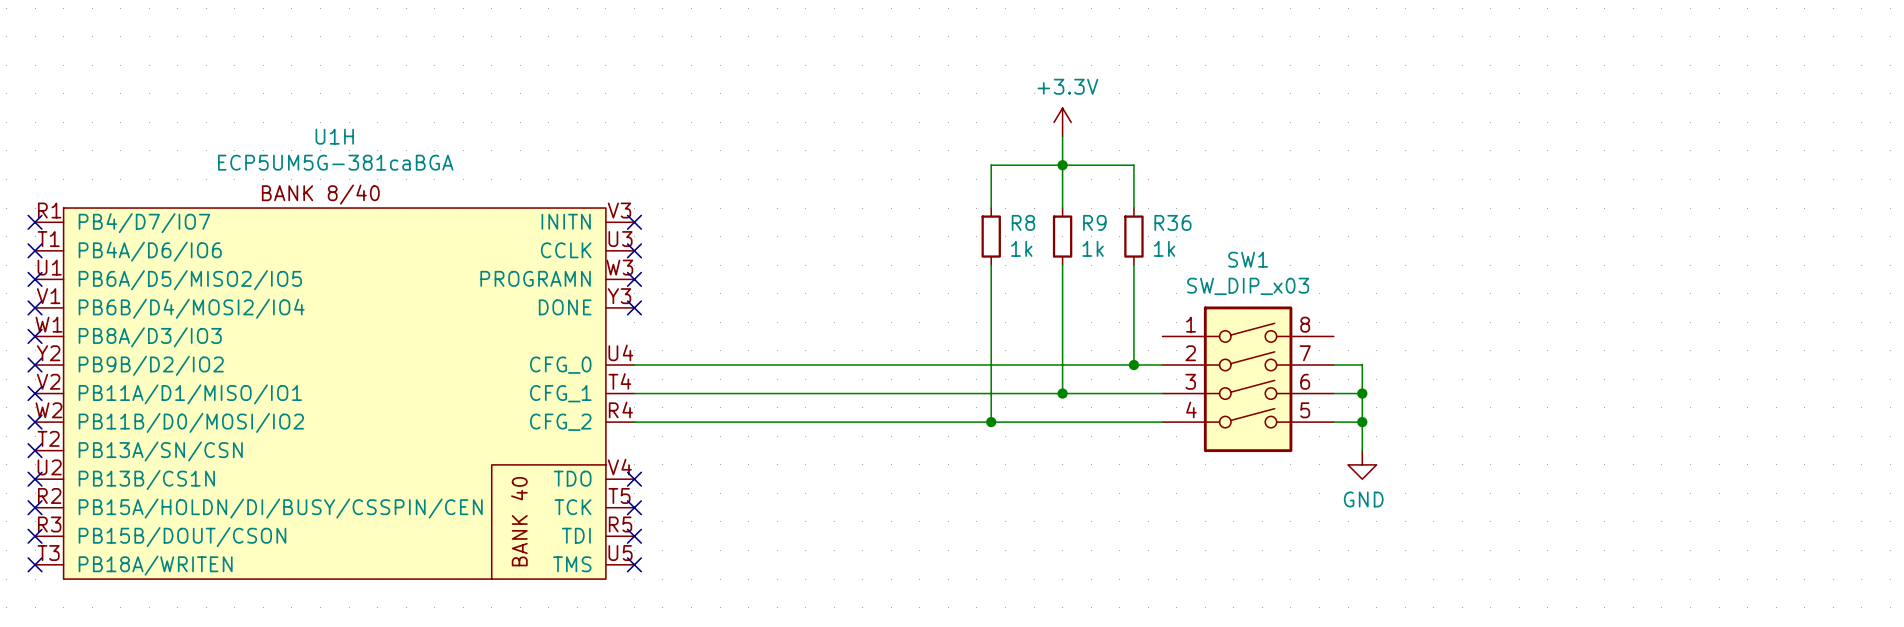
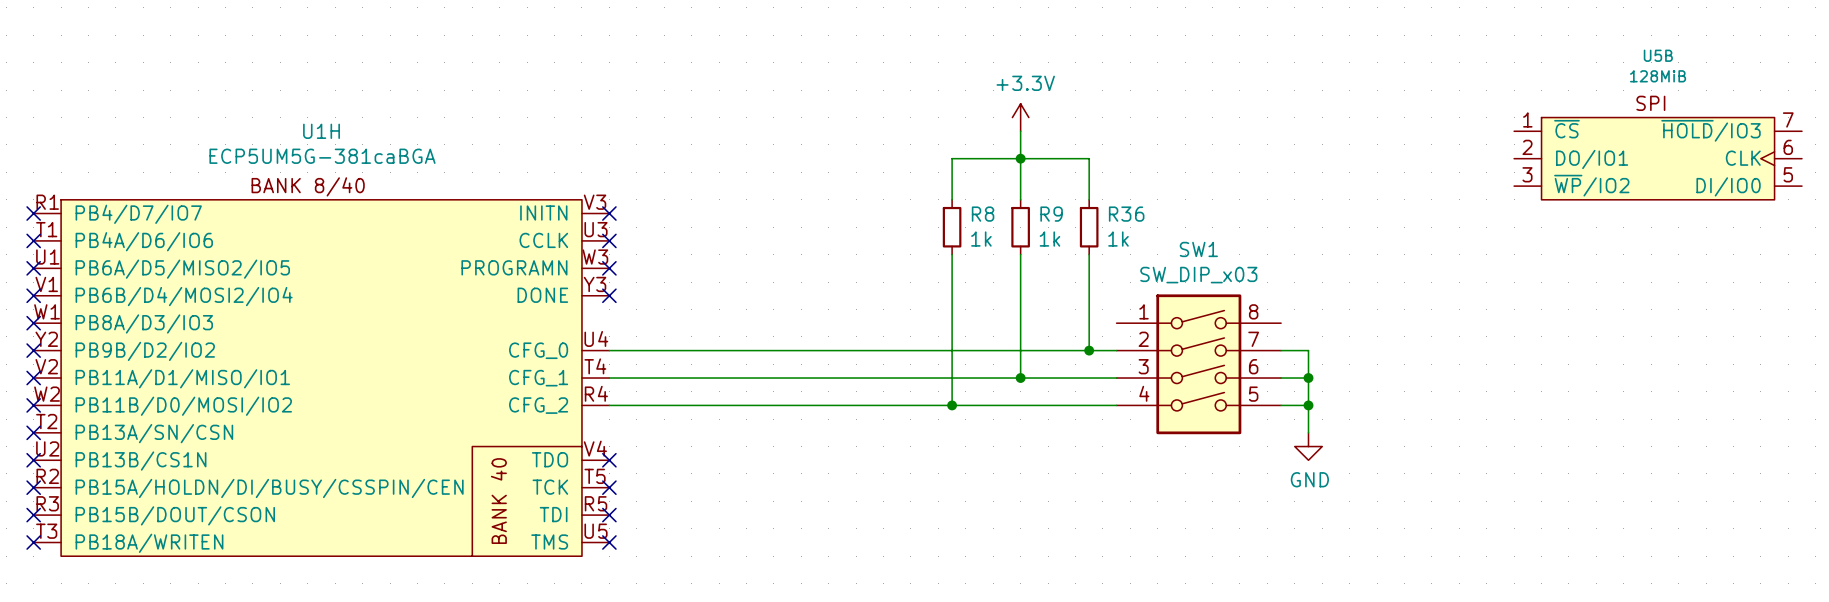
U5B: none -> 128MiB (1658, 158)

